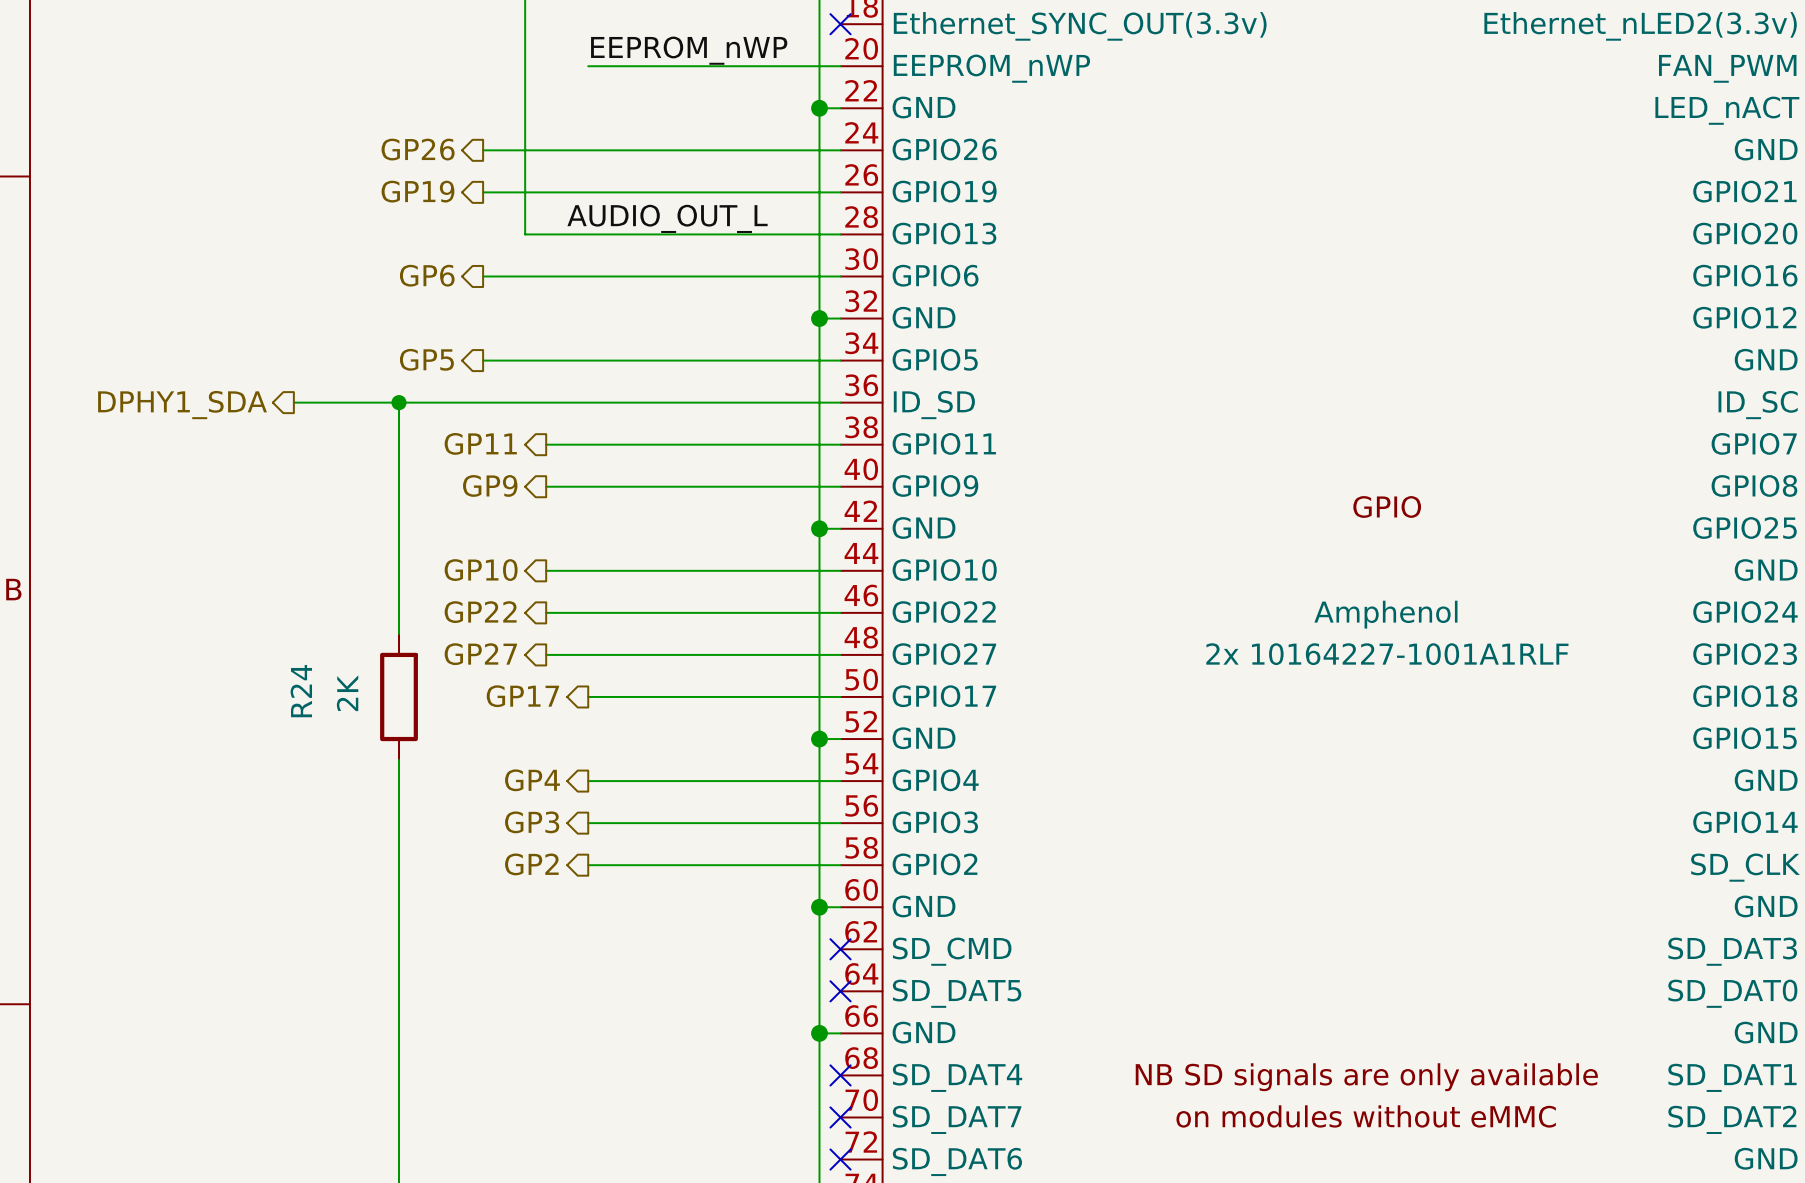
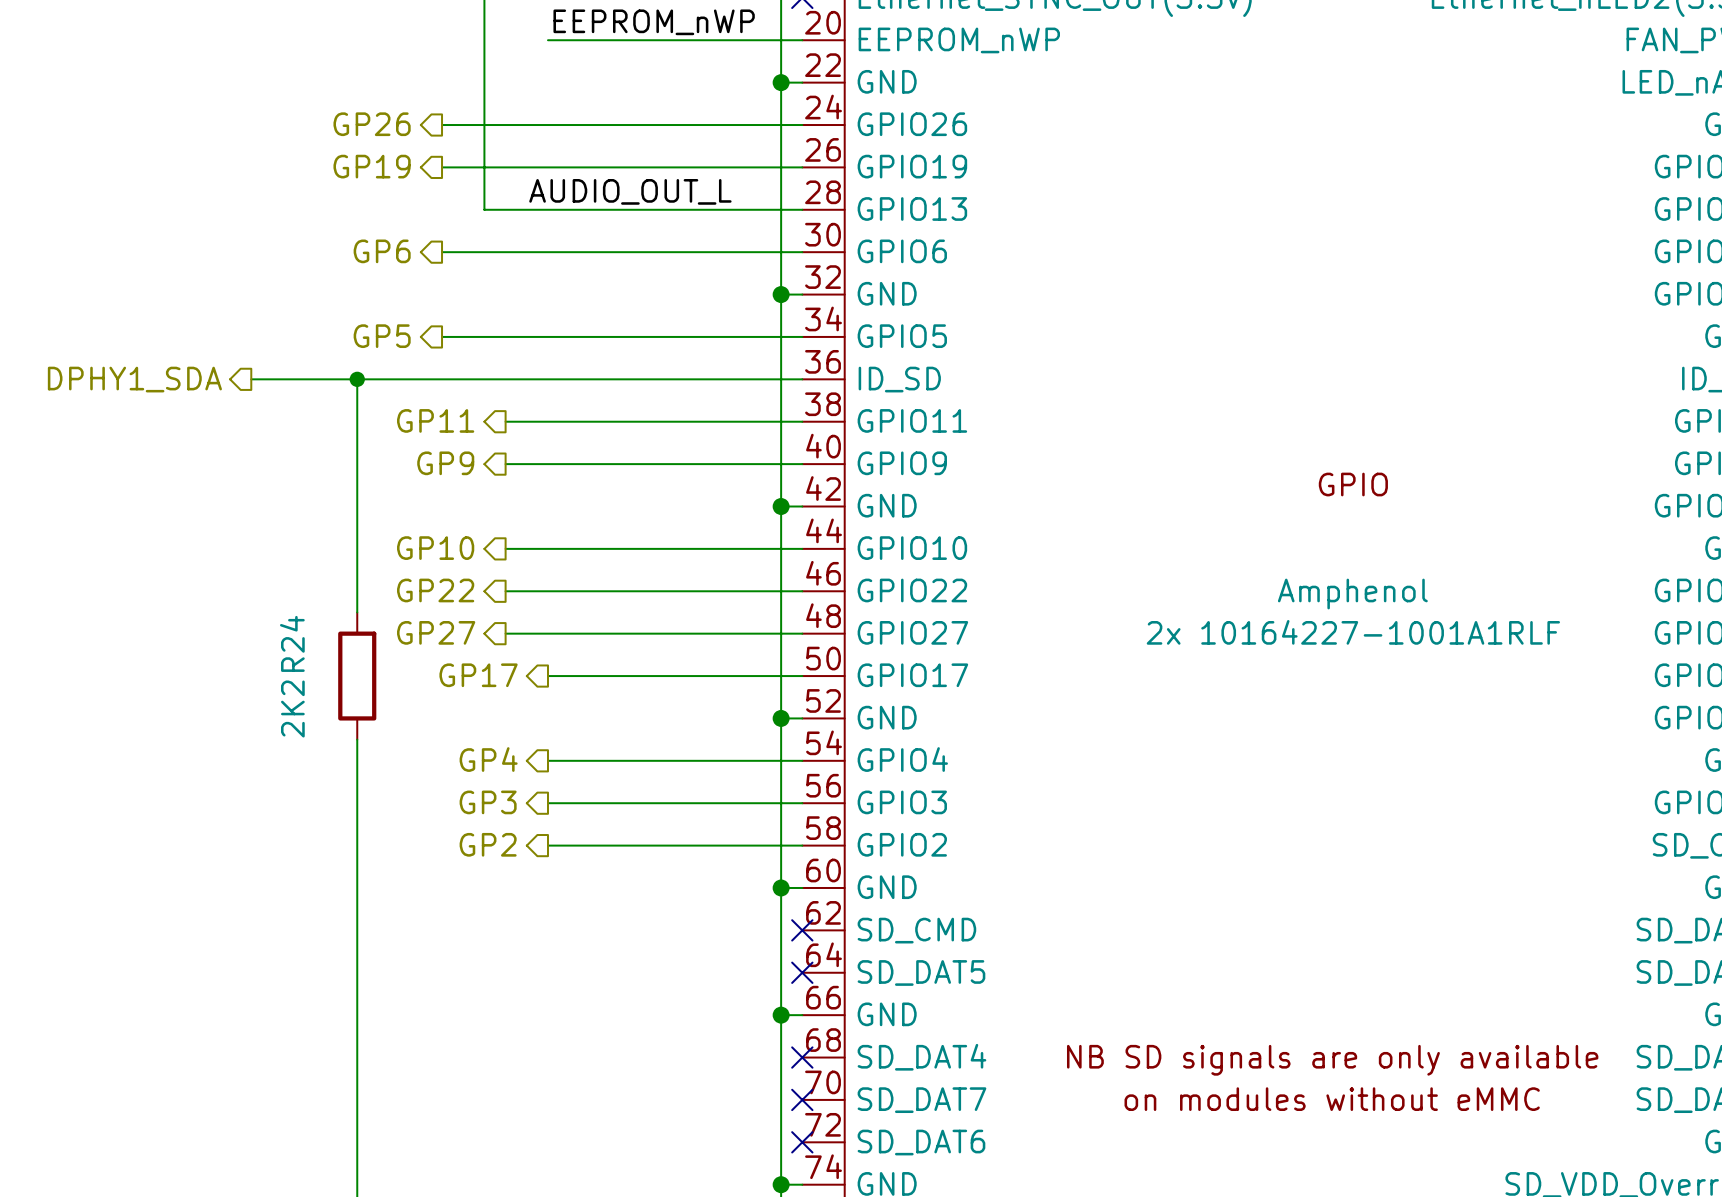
R24 name position: R24 (301, 691) -> R24 (292, 643)
R24 value: 2K (347, 693) -> 2K2 (292, 709)

